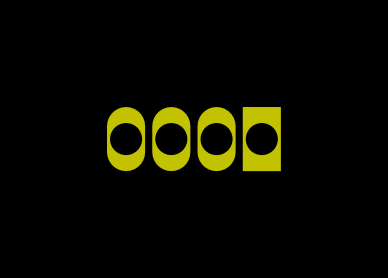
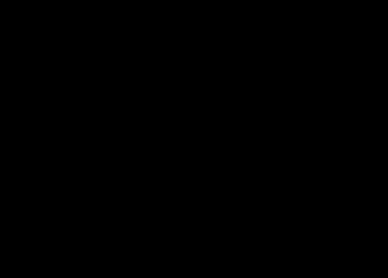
part: (193, 139) -> none

